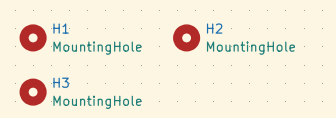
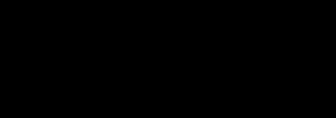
H1: MountingHole (33, 37) -> none
H2: MountingHole (186, 37) -> none
H3: MountingHole (33, 92) -> none

